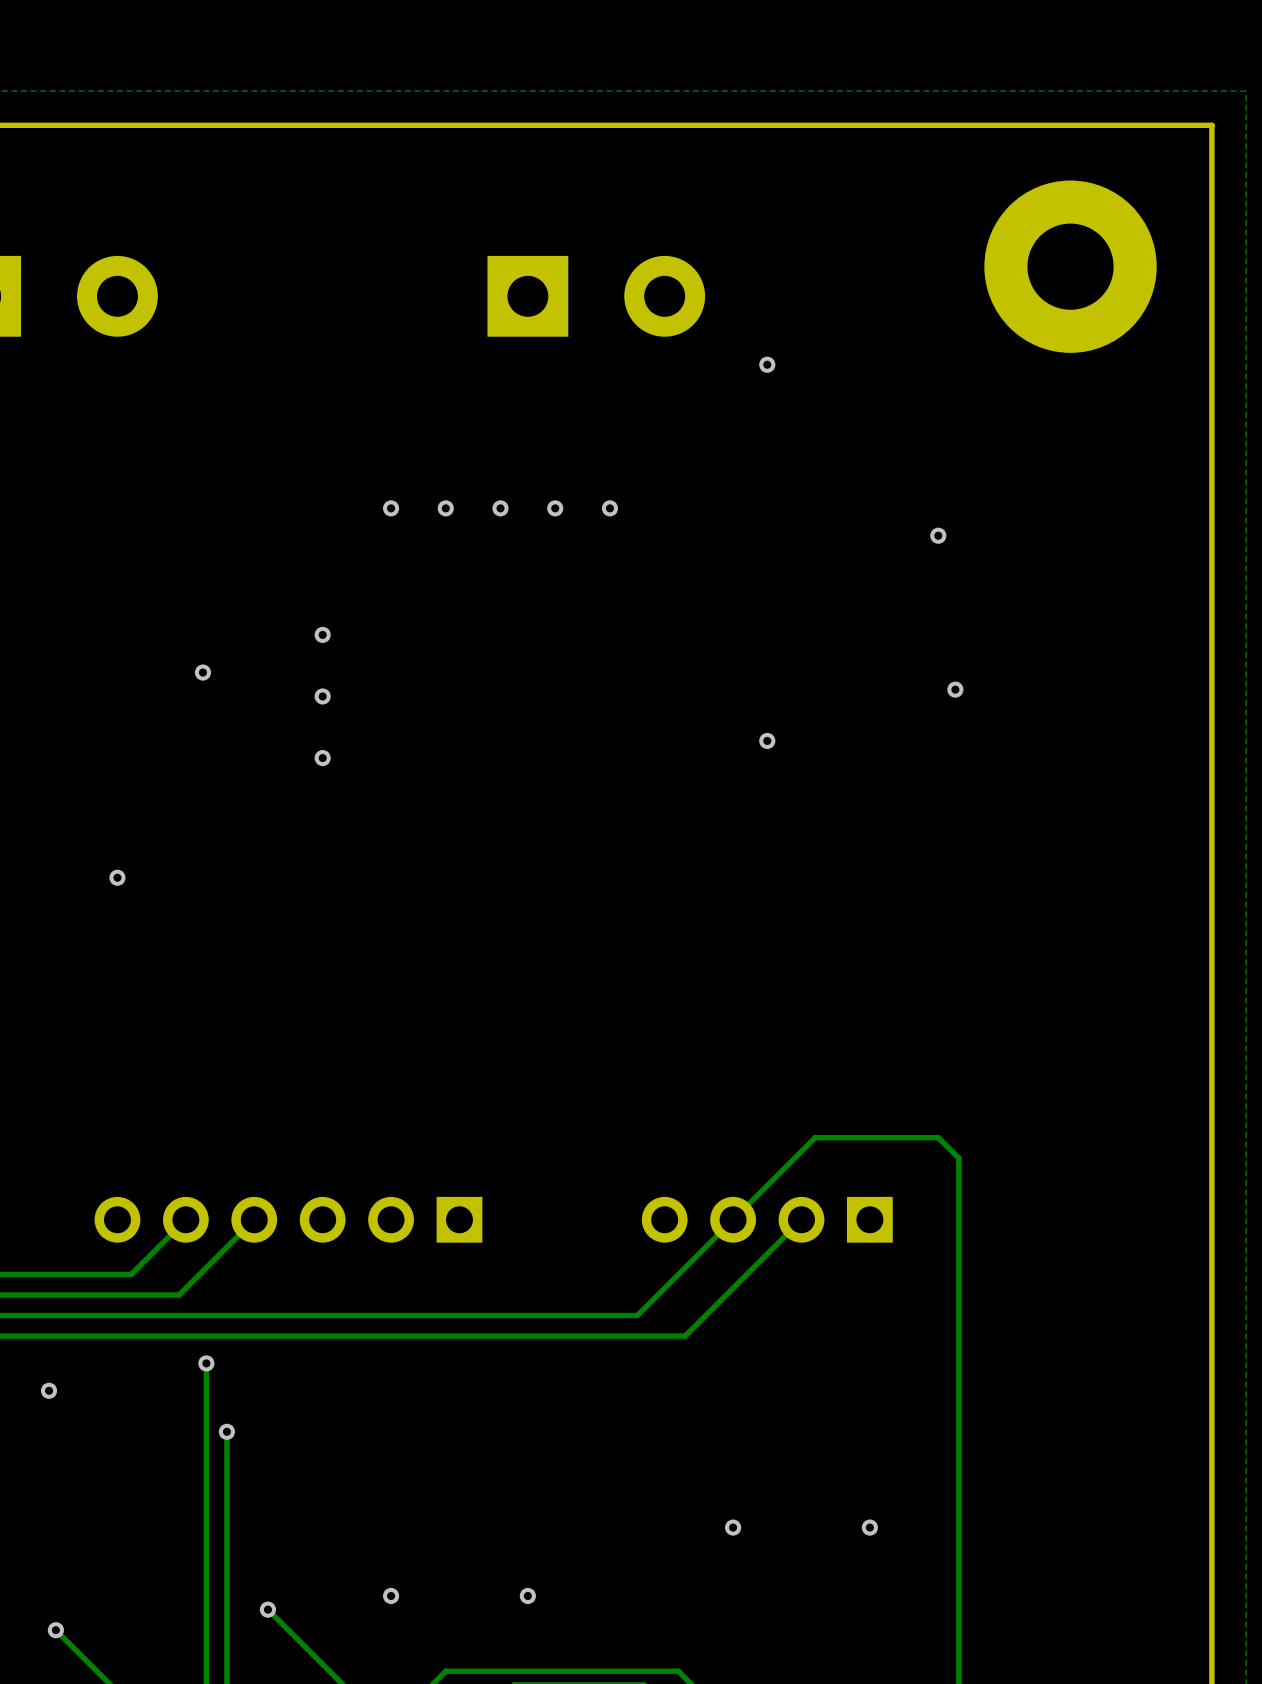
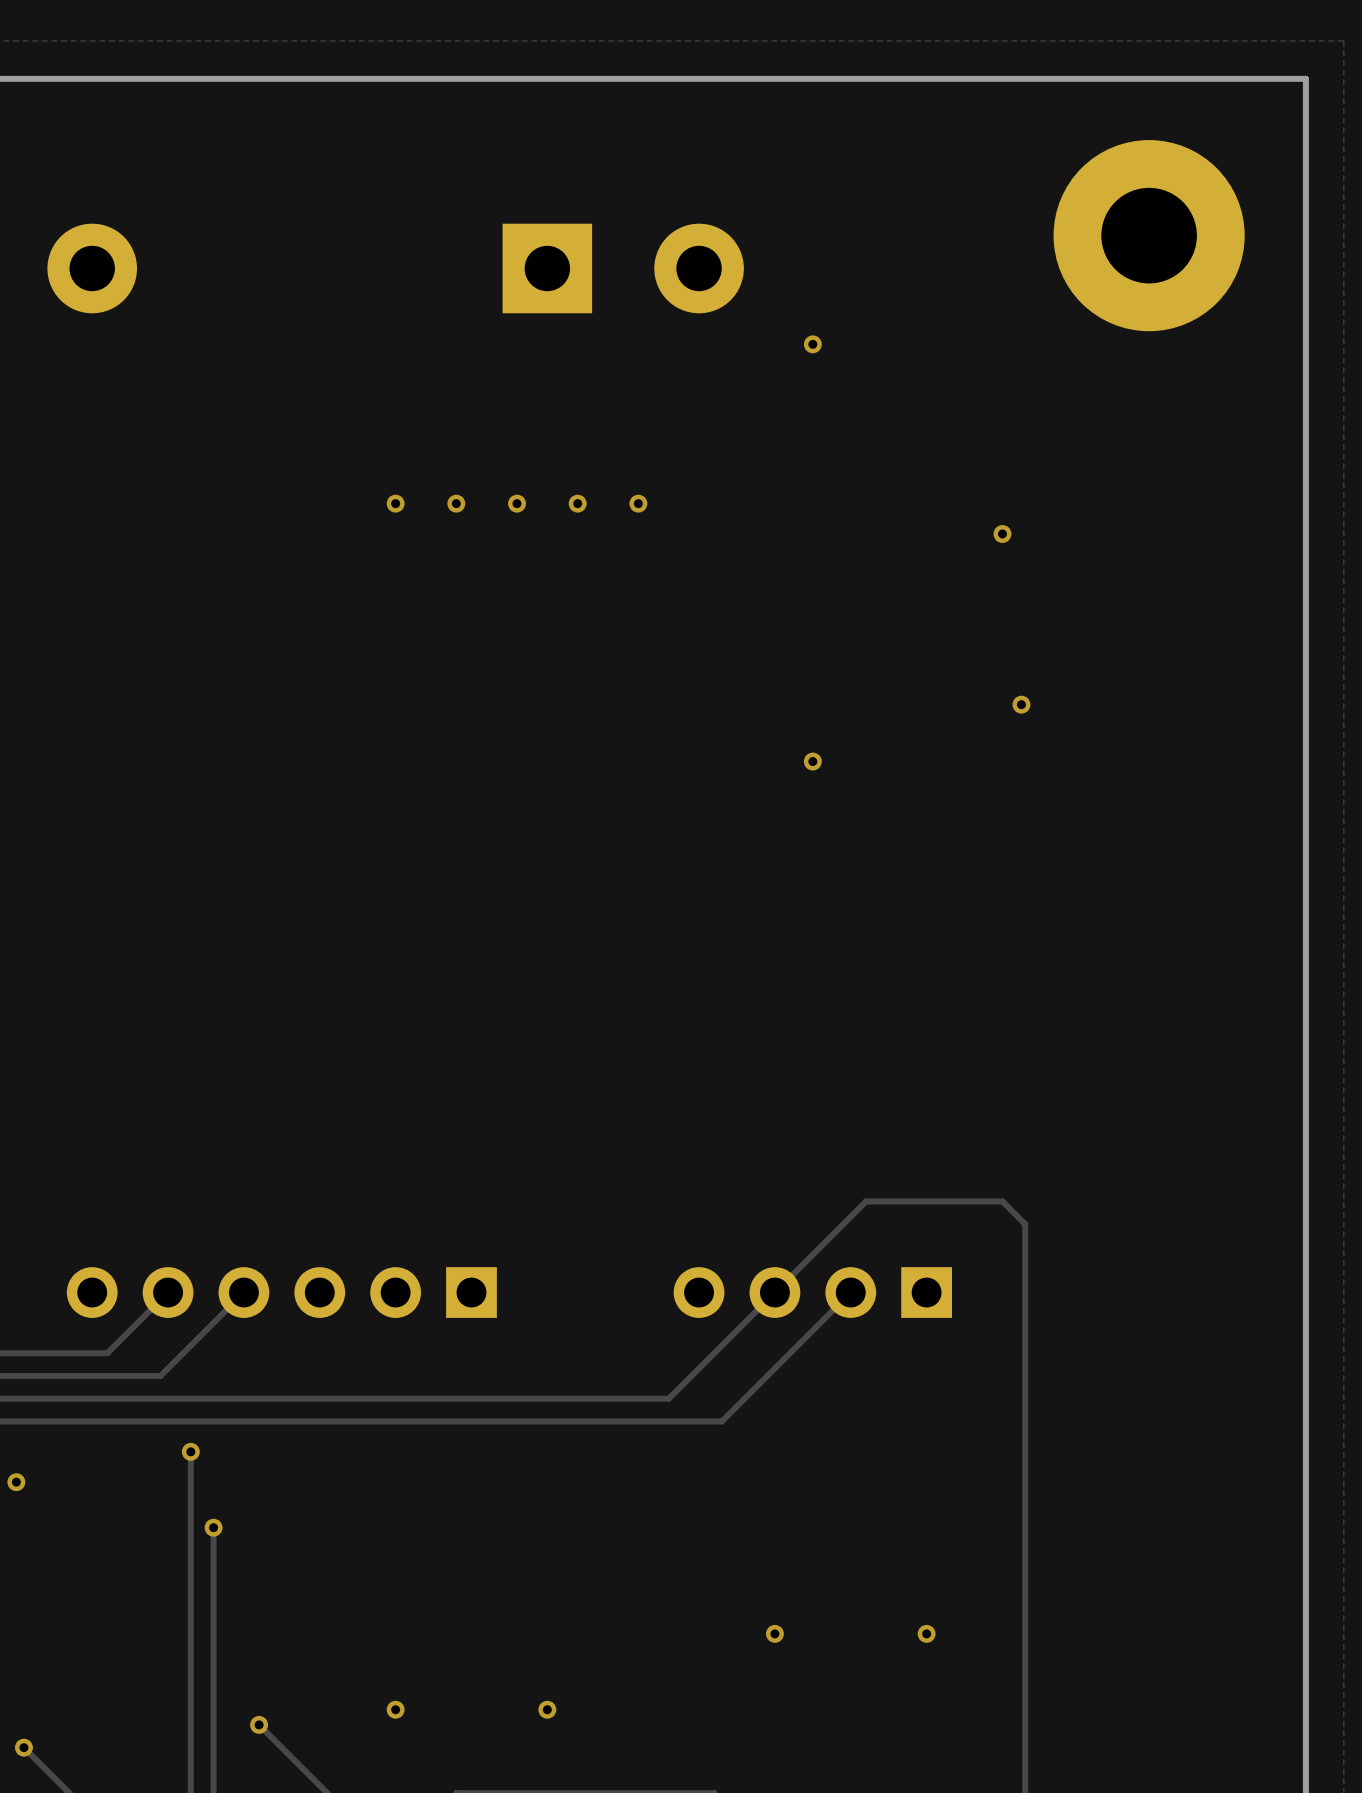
via: (322, 634) -> none
via: (202, 672) -> none
via: (322, 696) -> none
via: (322, 758) -> none
via: (117, 877) -> none

